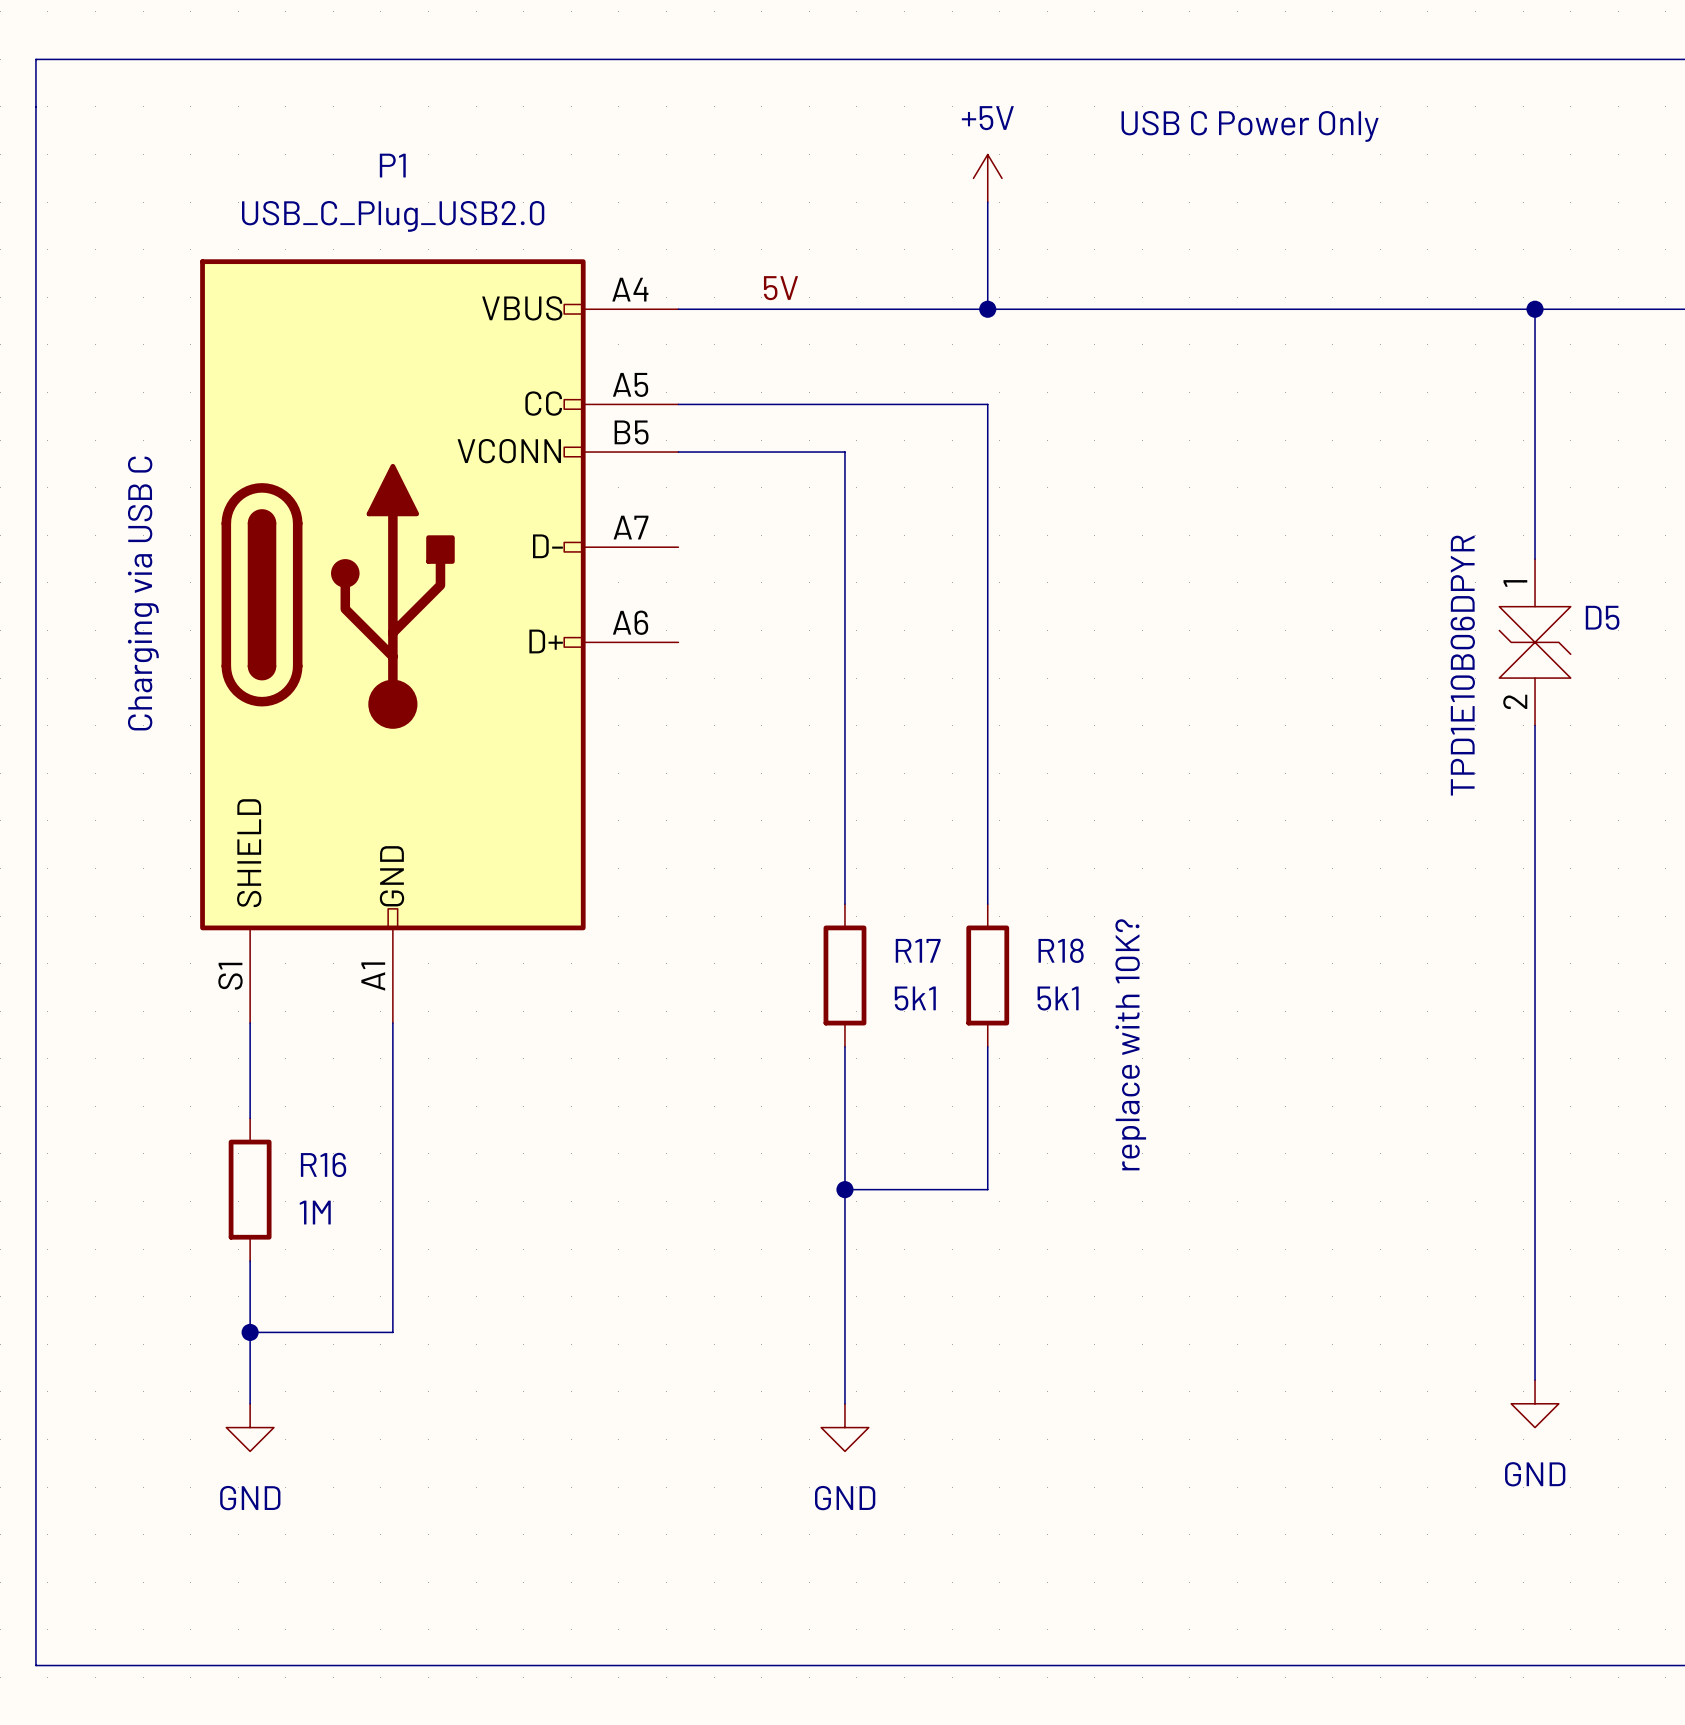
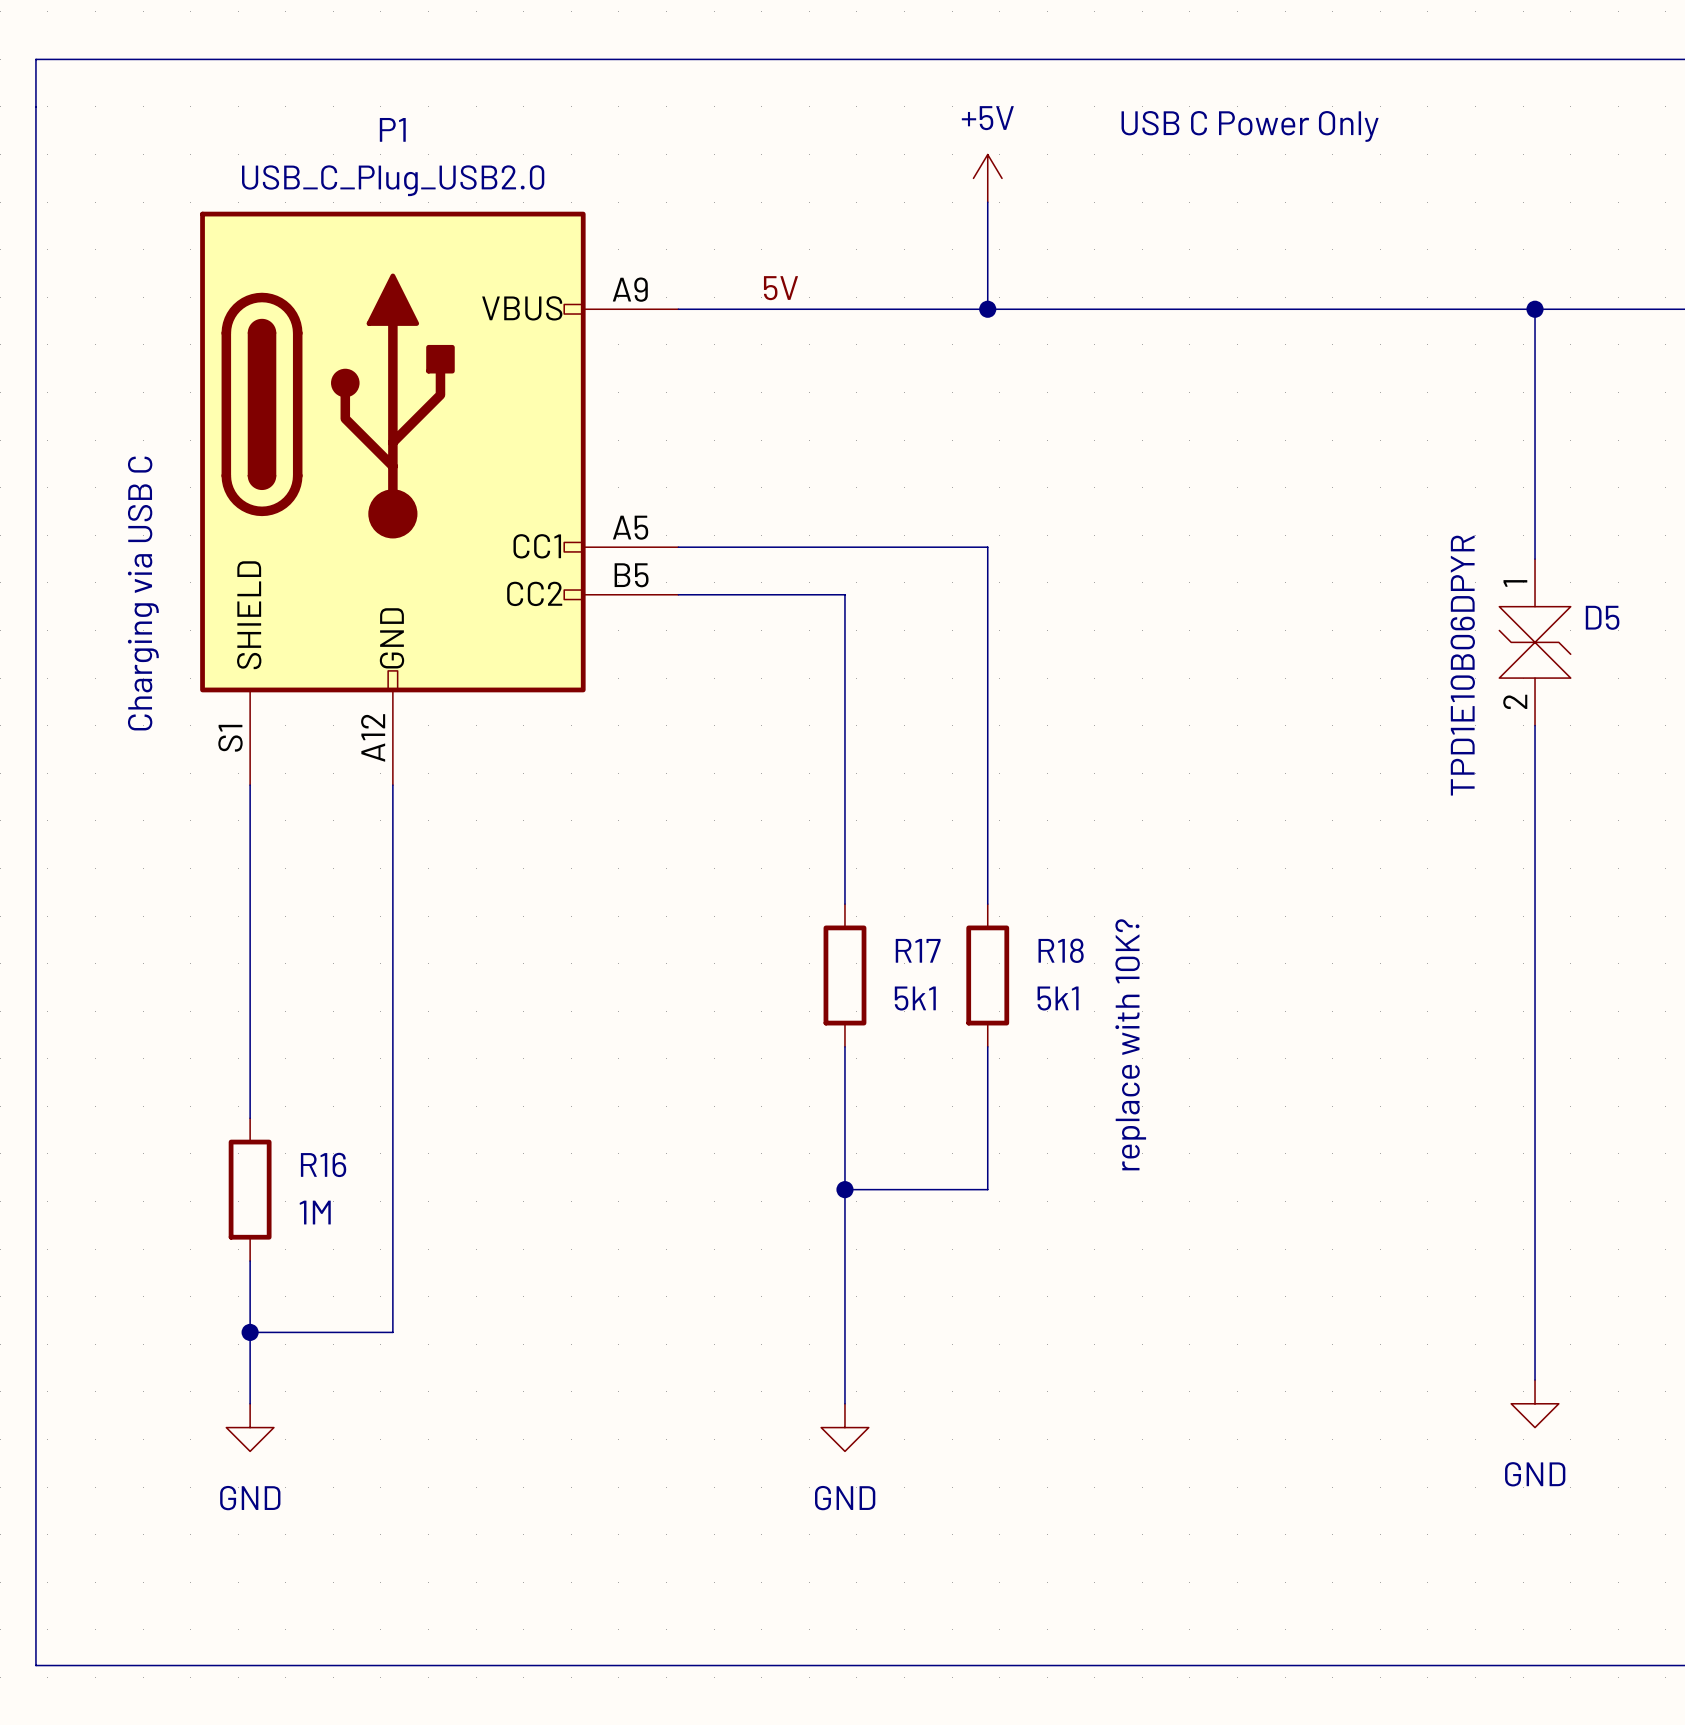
P1 name position: P1 (392, 165) -> P1 (392, 129)
P1 value position: USB_C_Plug_USB2.0 (393, 216) -> USB_C_Plug_USB2.0 (393, 180)
P1 symbol: [200, 259, 679, 1024] -> [200, 211, 679, 786]
wire: (678, 404) (987, 404) (987, 547) -> (678, 547) (987, 547)
wire: (678, 452) (844, 452) (844, 594) -> (678, 594) (844, 594)

